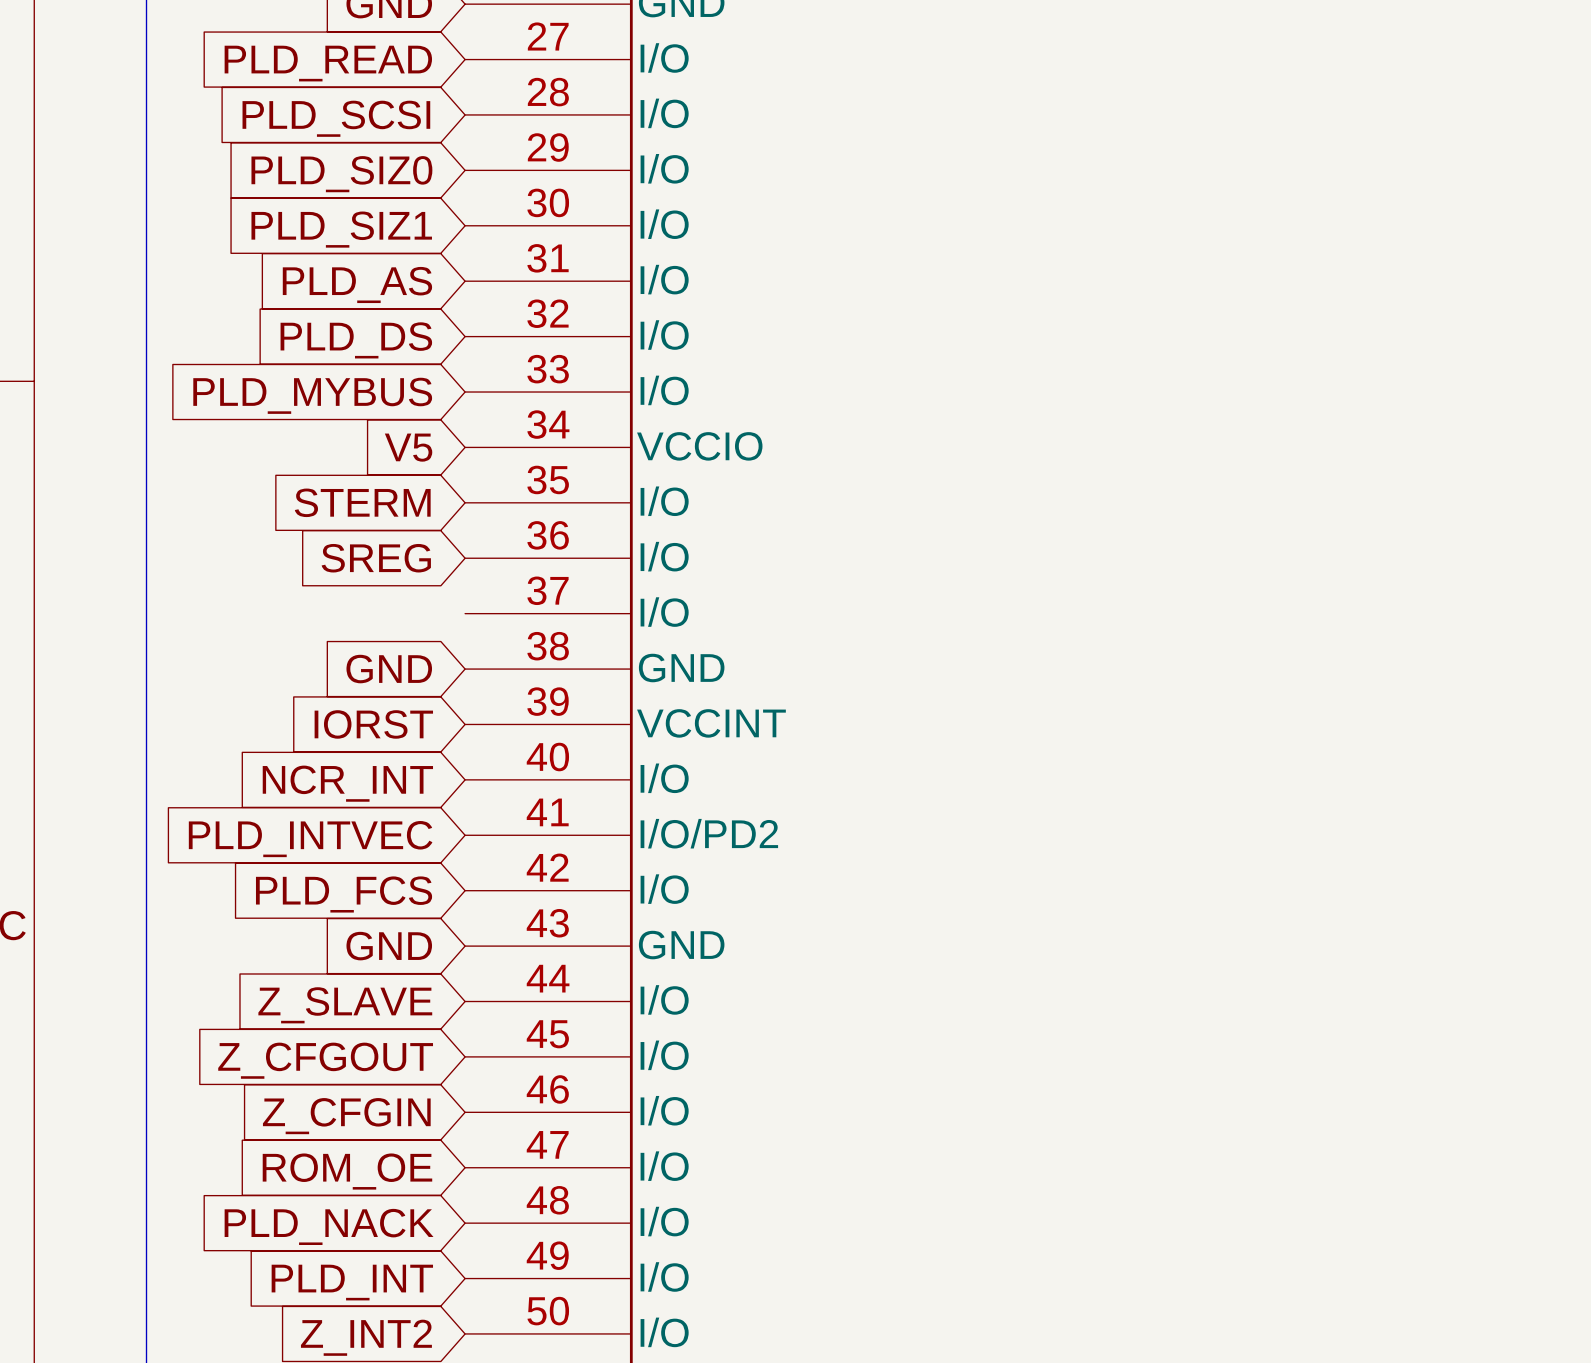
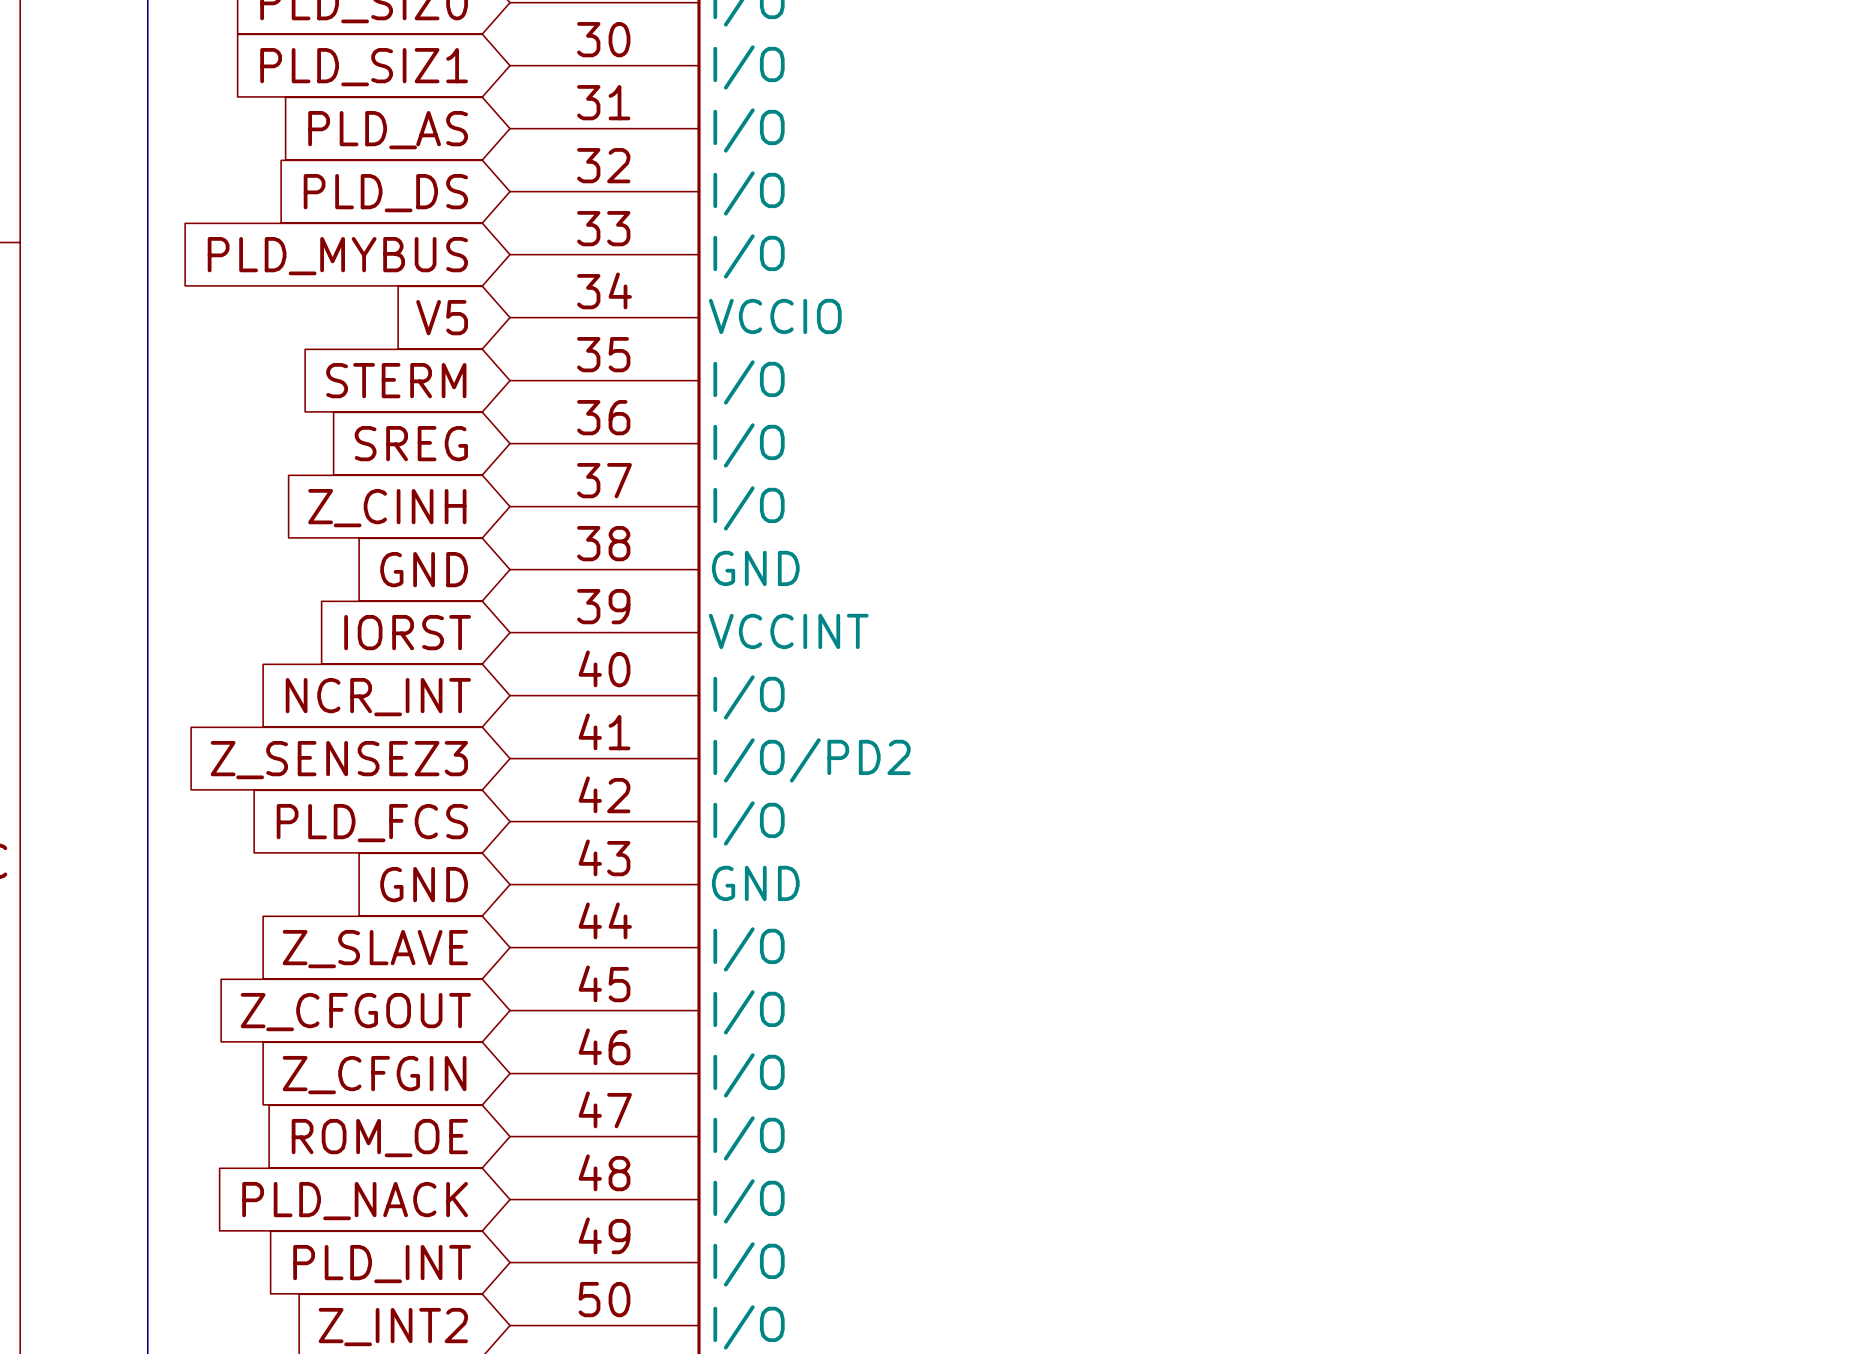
global label: none -> Z_CINH (387, 508)
global label: PLD_INTVEC (310, 839) -> Z_SENSEZ3 (339, 760)

